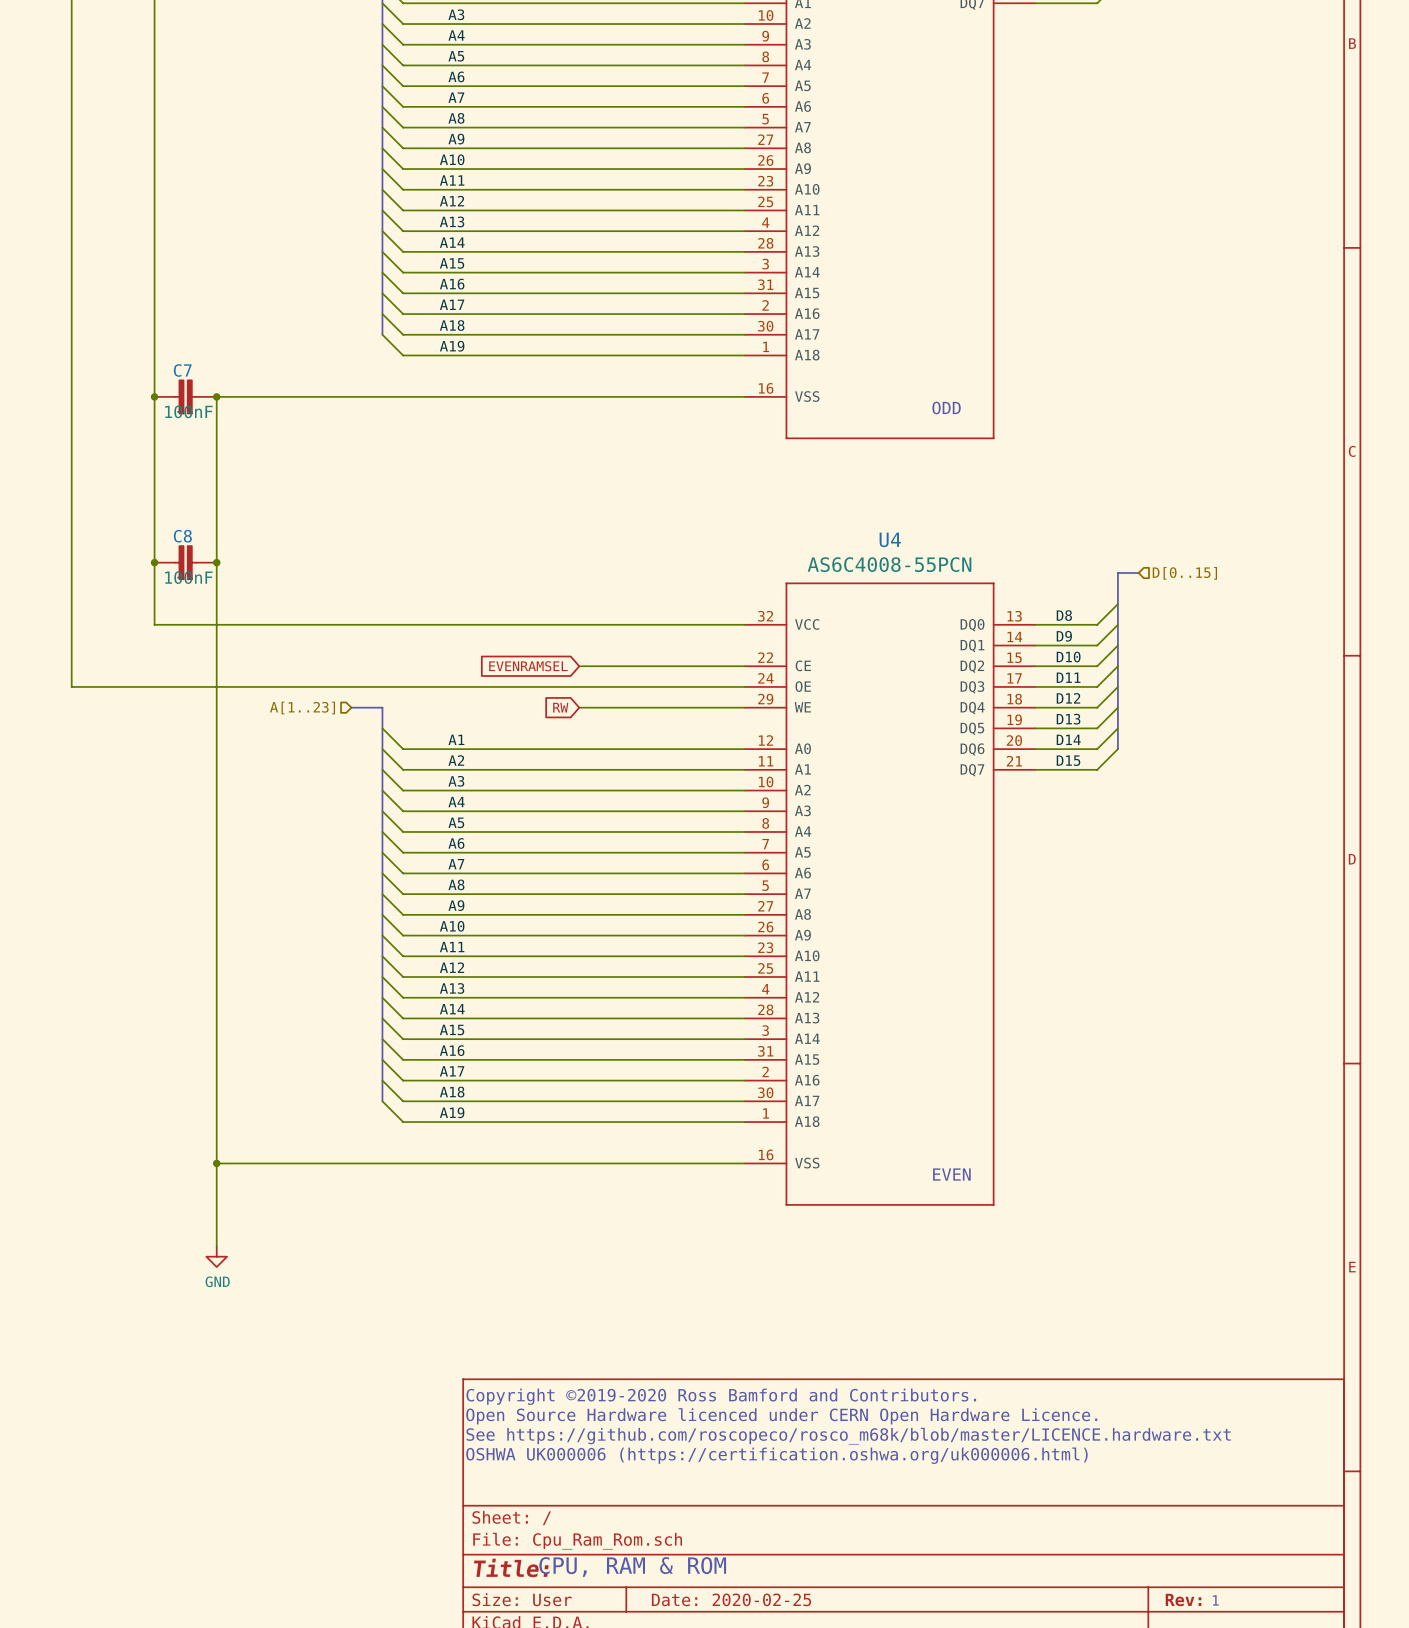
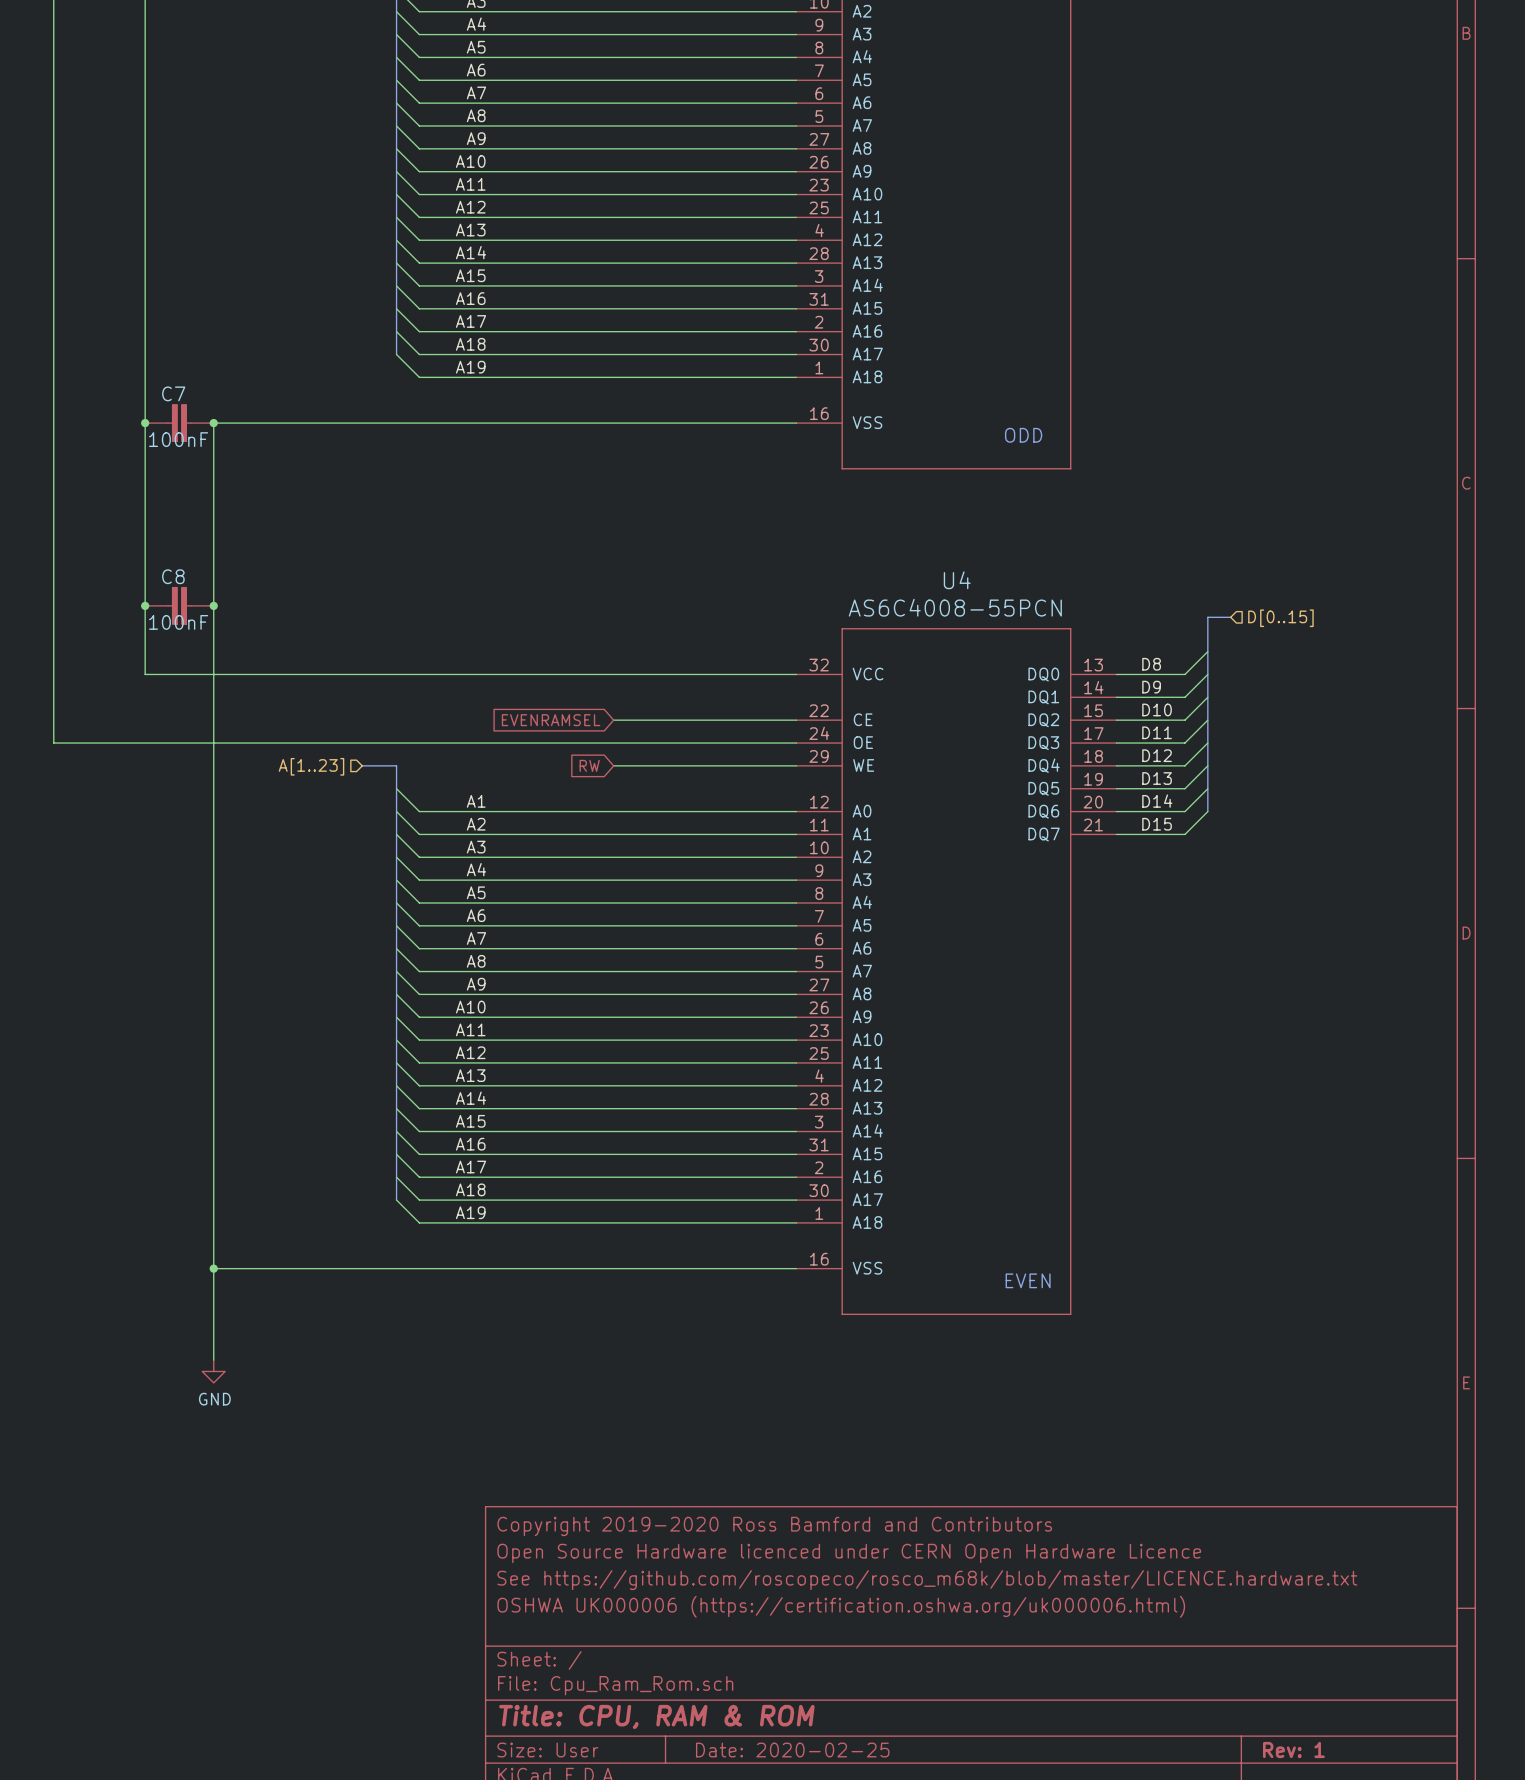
title block: none -> Copyright 2019-2020 Ross Bamford and Contributors (774, 1526)
text: Copyright ©2019-2020 Ross Bamford and Contributors. (721, 1396) -> none
text: Open Source Hardware licenced under CERN Open Hardware Licence. (781, 1416) -> none
title block: none -> Open Source Hardware licenced under CERN Open Hardware Licence (849, 1553)
text: See https://github.com/roscopeco/rosco_m68k/blob/master/LICENCE.hardware.txt (848, 1436) -> none
title block: none -> See https://github.com/roscopeco/rosco_m68k/blob/master/LICENCE.hardware.txt (927, 1580)
text: OSHWA UK000006 (https://certification.oshwa.org/uk000006.html) (776, 1455) -> none
title block: none -> OSHWA UK000006 (https://certification.oshwa.org/uk000006.html) (841, 1606)
title block: Title: (511, 1567) -> Title: CPU, RAM & ROM (656, 1716)
text: CPU, RAM & ROM (632, 1567) -> none
title block: Rev: (1183, 1599) -> Rev: 1 (1293, 1750)
text: 1 (1215, 1600) -> none

